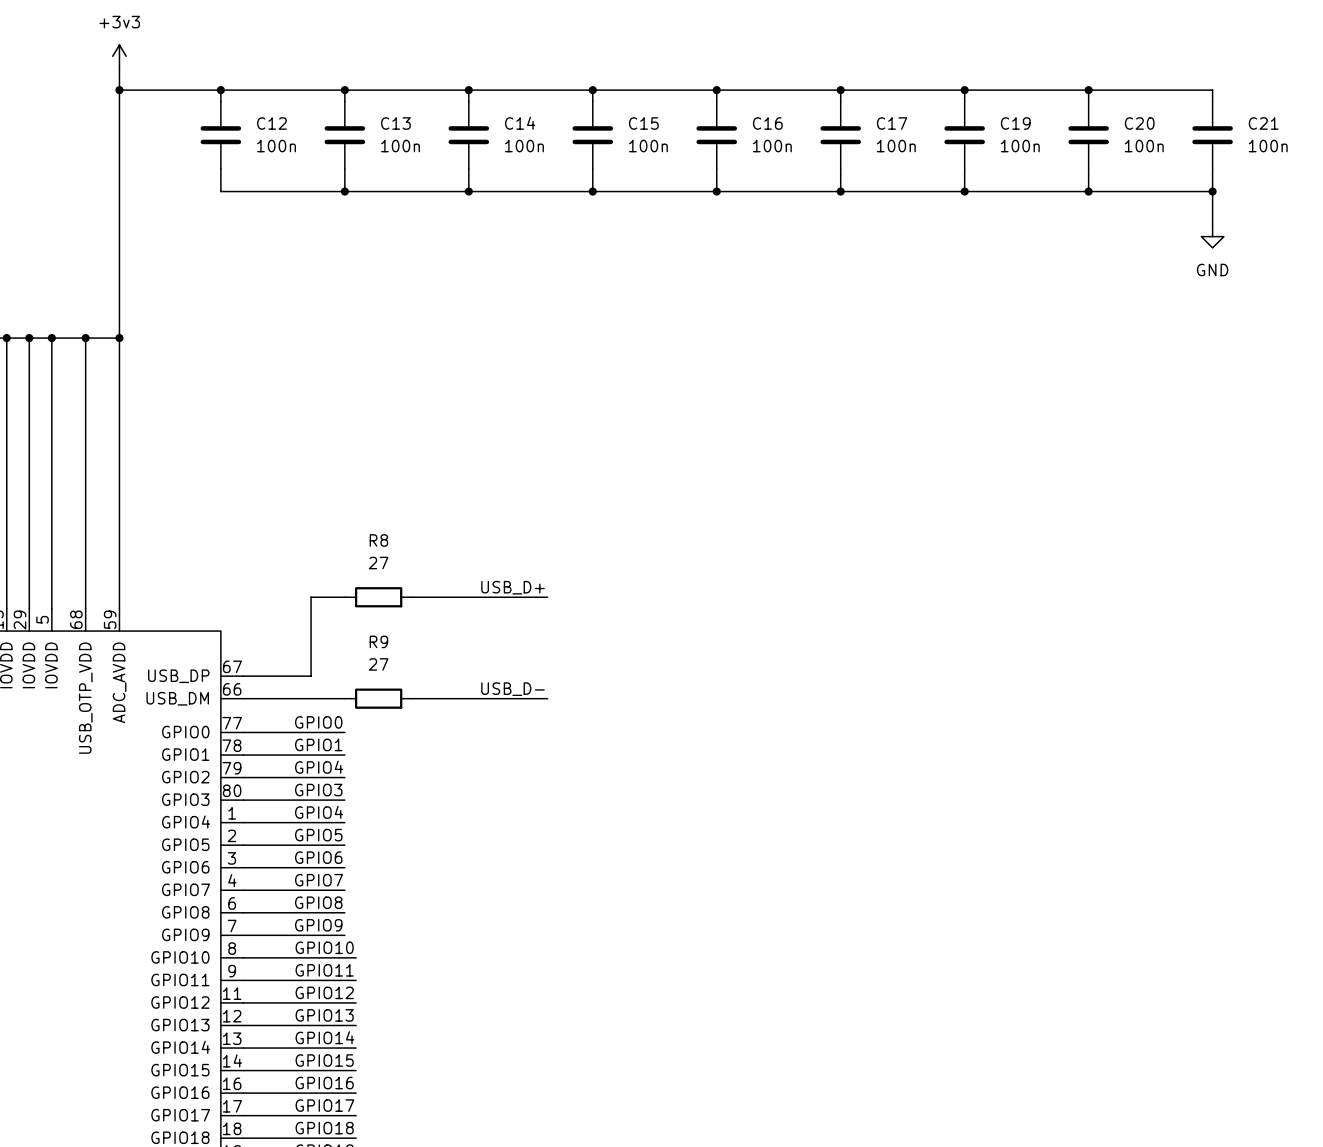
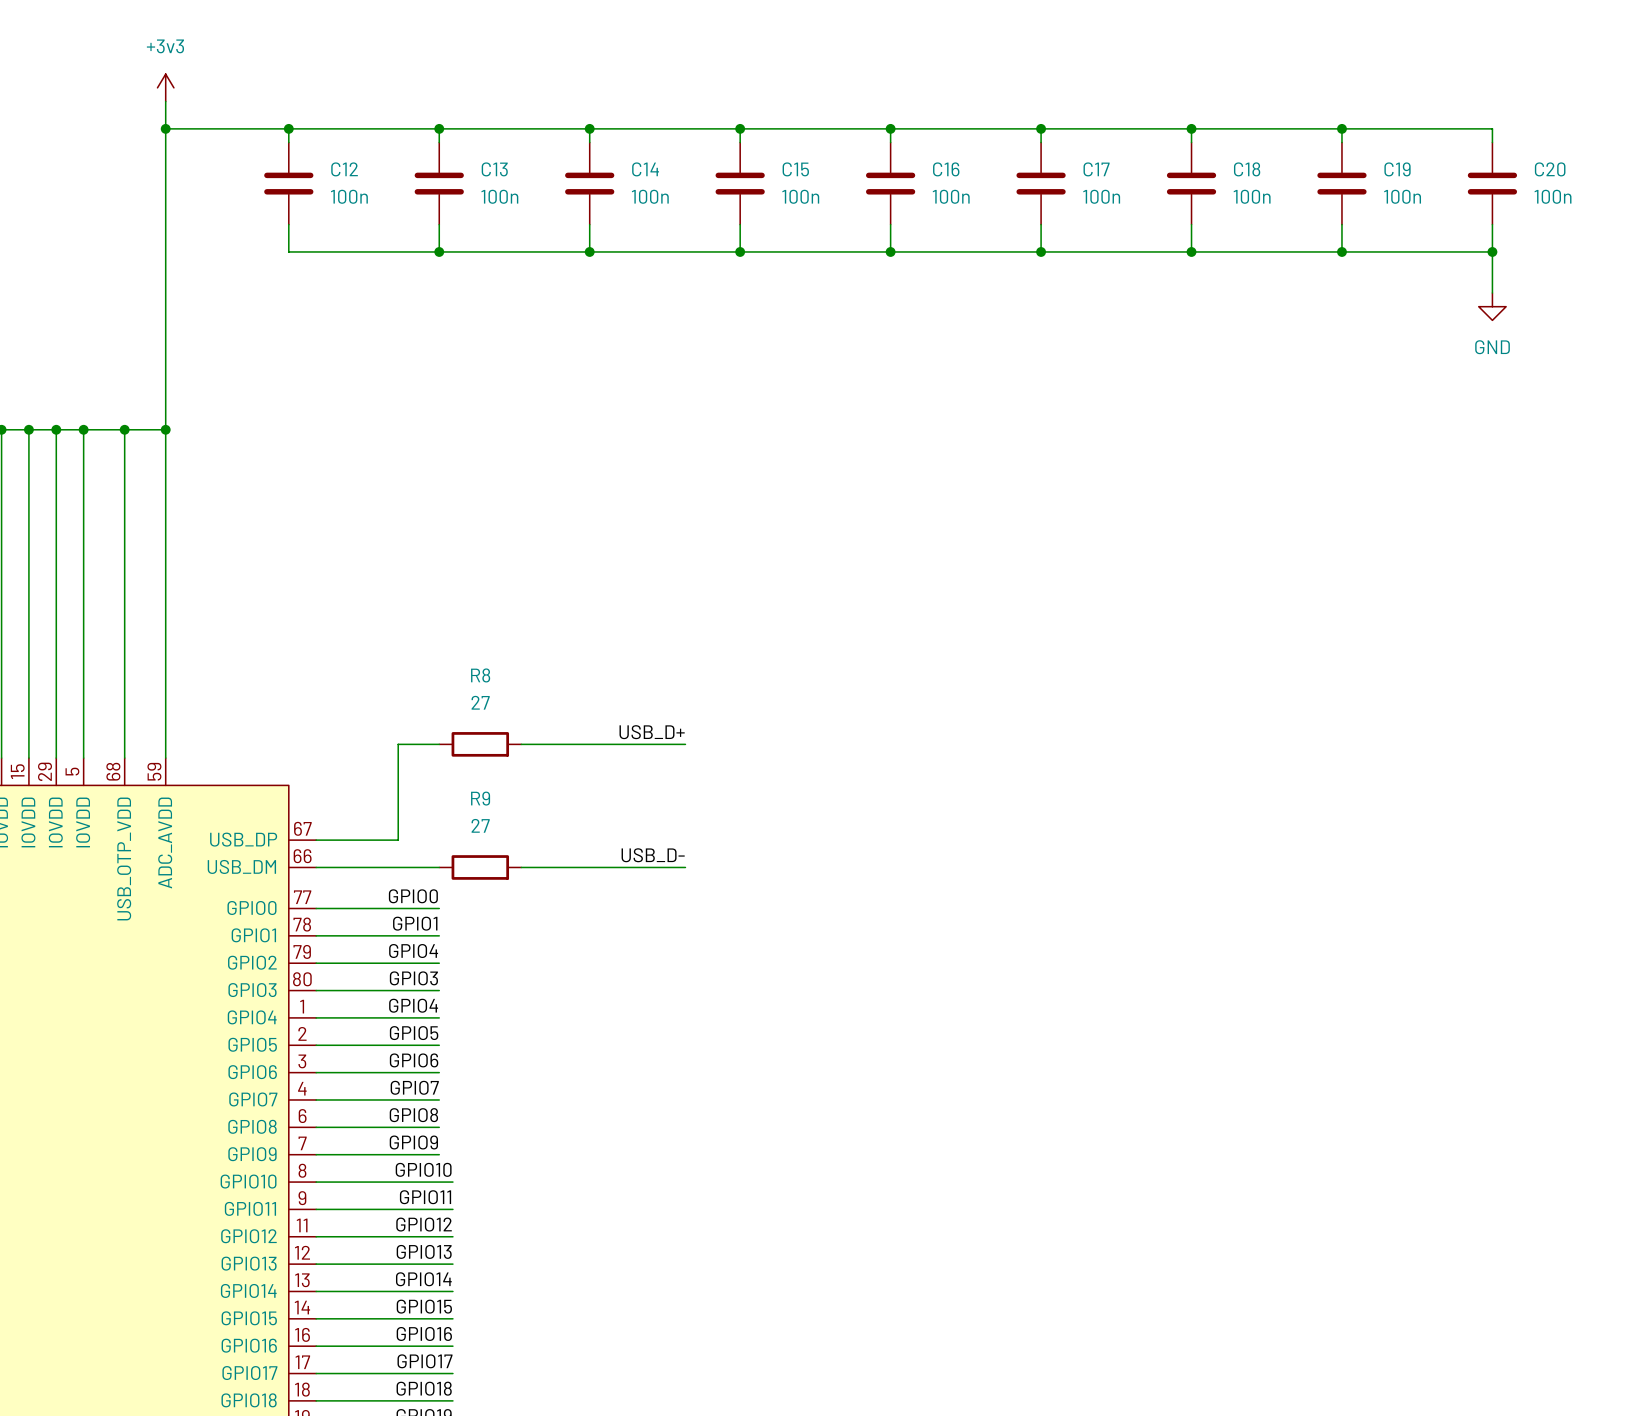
C19 name: C19 (1015, 123) -> C18 (1247, 169)
C20 name: C20 (1139, 123) -> C19 (1397, 169)
C21 name: C21 (1263, 123) -> C20 (1550, 169)

